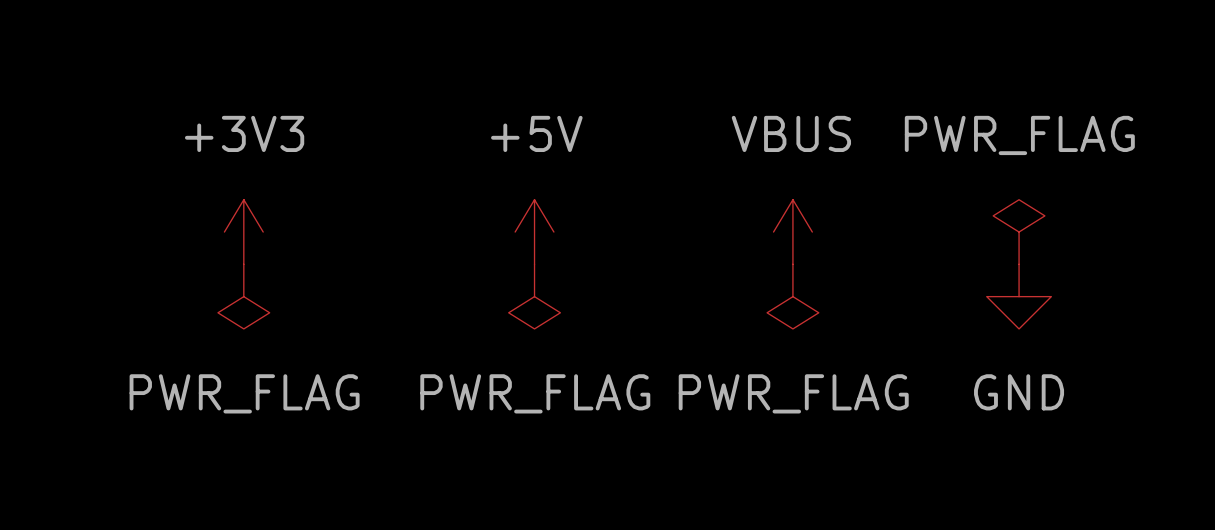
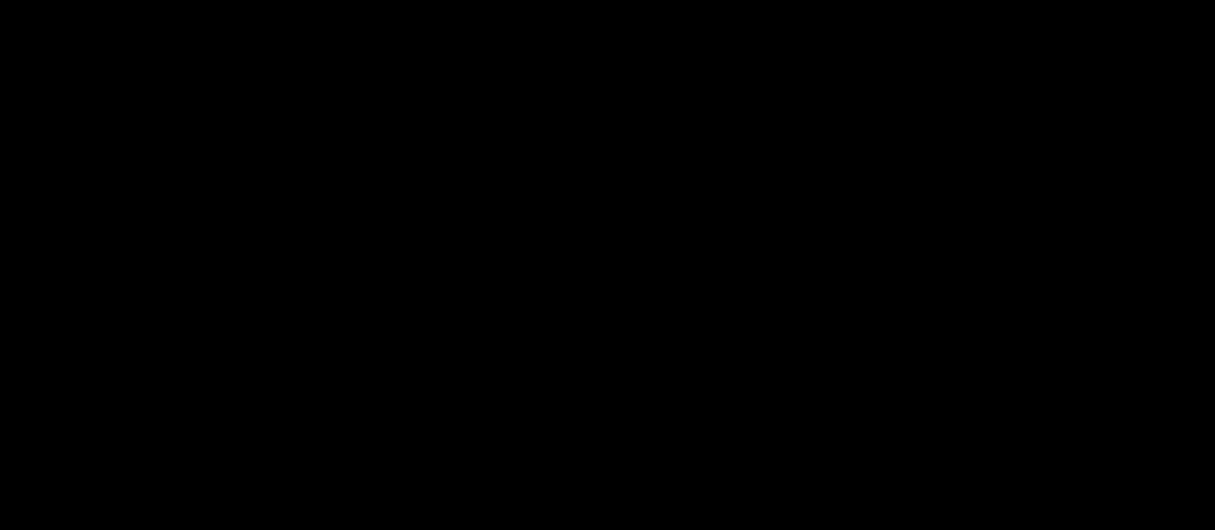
power symbol: +3V3 (243, 232) -> none
power symbol: +5V (534, 232) -> none
power symbol: VBUS (792, 232) -> none
power symbol: PWR_FLAG (1019, 232) -> none
power symbol: PWR_FLAG (243, 296) -> none
power symbol: PWR_FLAG (534, 296) -> none
power symbol: PWR_FLAG (792, 296) -> none
power symbol: GND (1019, 296) -> none

